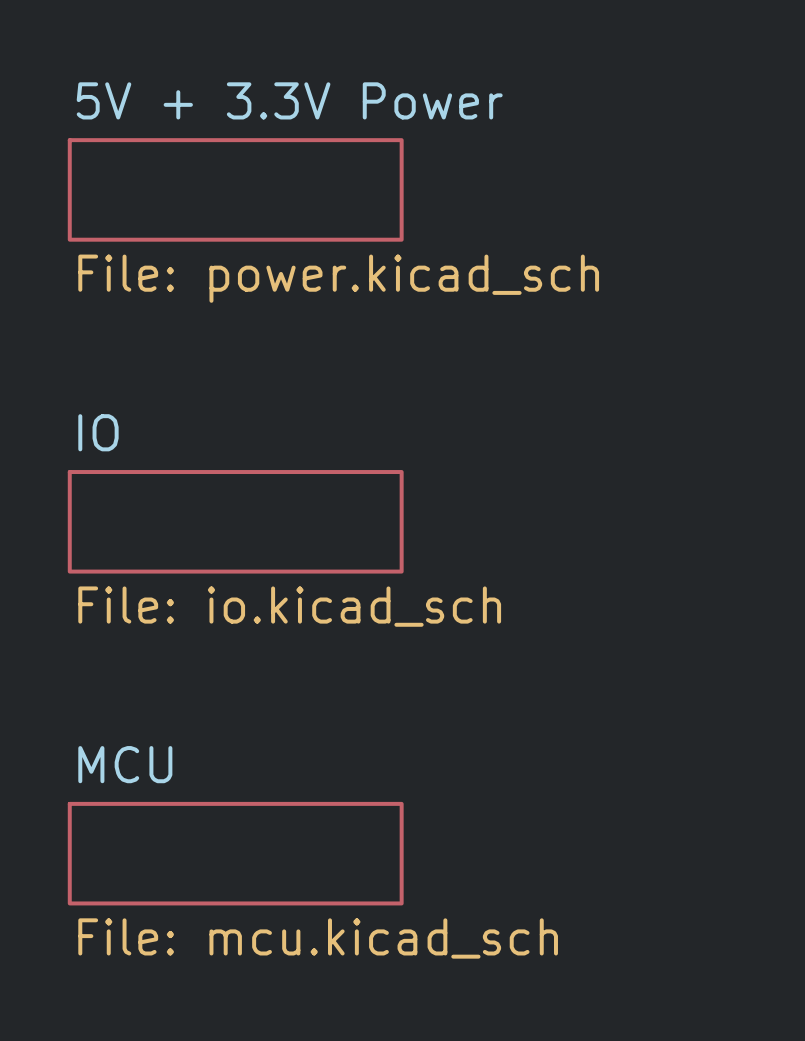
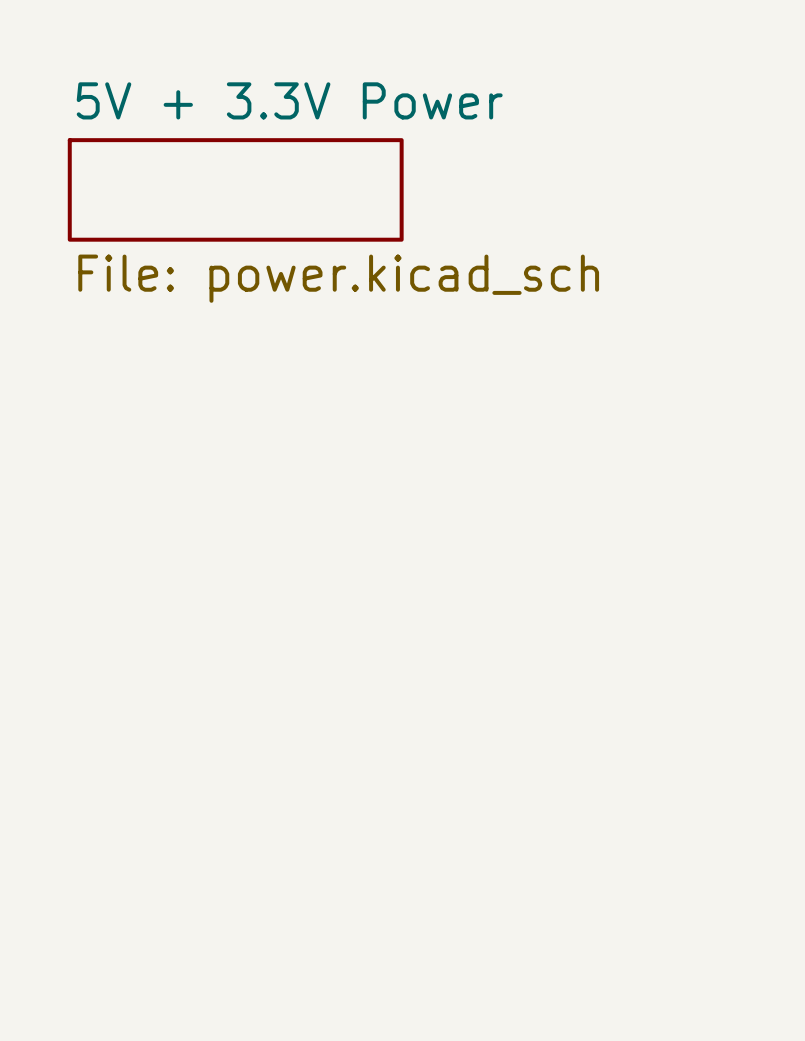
sheet IO: File: io.kicad_sch (235, 521) -> none
sheet MCU: File: mcu.kicad_sch (235, 853) -> none

